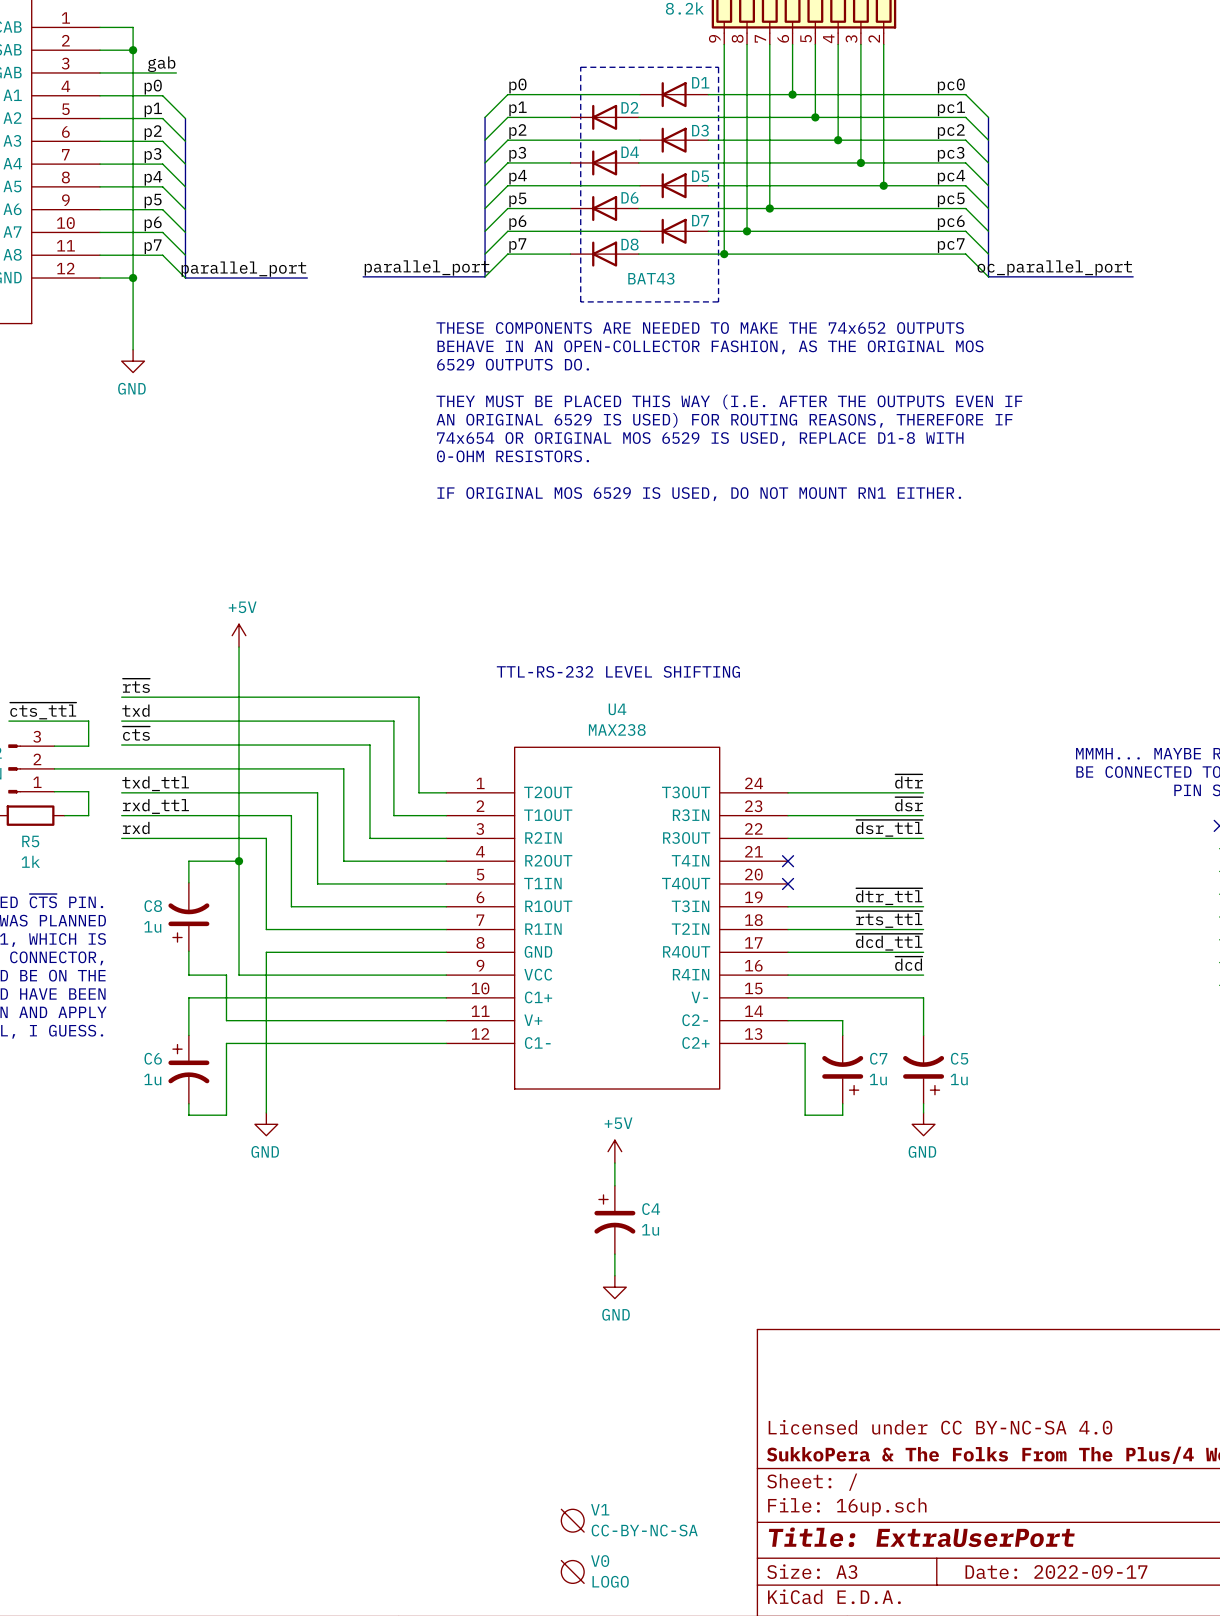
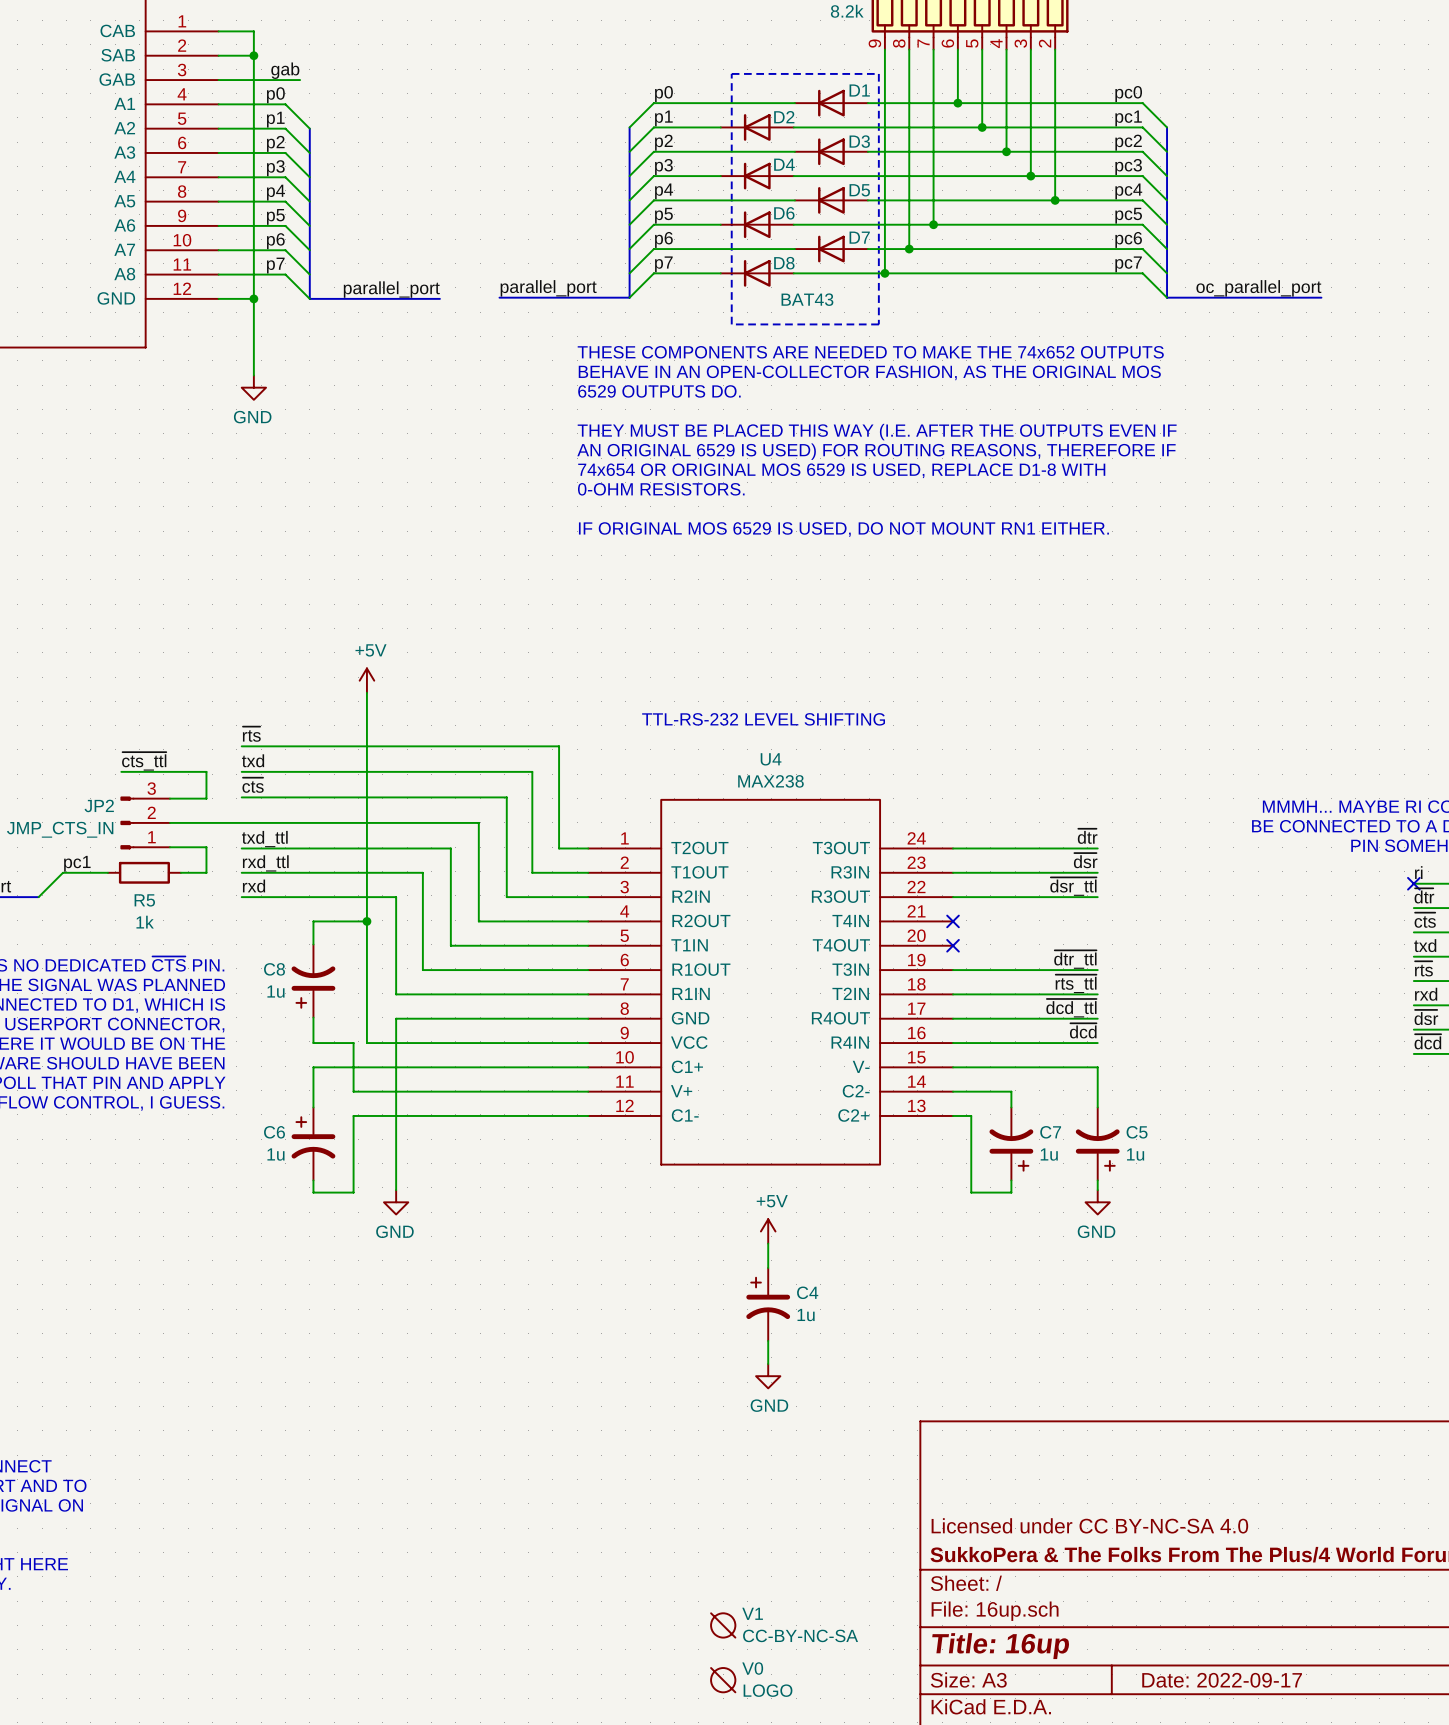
title block: Title: ExtraUserPort (921, 1537) -> Title: 16up (1000, 1646)

